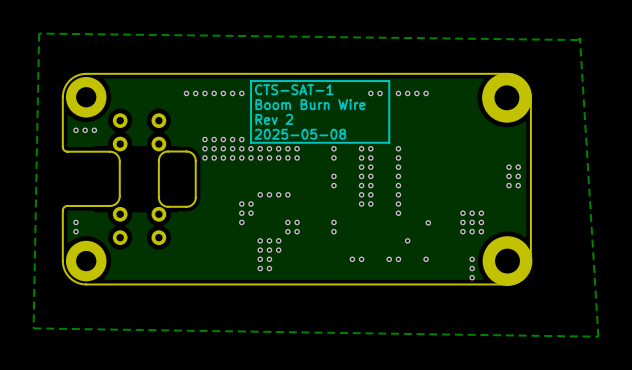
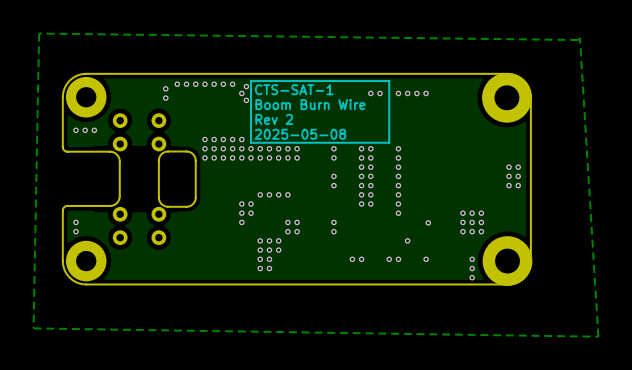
via: none -> (177, 84)
via: none -> (186, 84)
via: none -> (195, 84)
via: none -> (204, 84)
via: none -> (214, 84)
via: none -> (223, 84)
via: none -> (232, 84)
via: none -> (246, 86)
via: none -> (165, 88)
via: (186, 93) -> none
via: (195, 93) -> none
via: (204, 93) -> none
via: (214, 93) -> none
via: (223, 93) -> none
via: (232, 93) -> none
via: none -> (165, 98)
via: none -> (246, 100)

